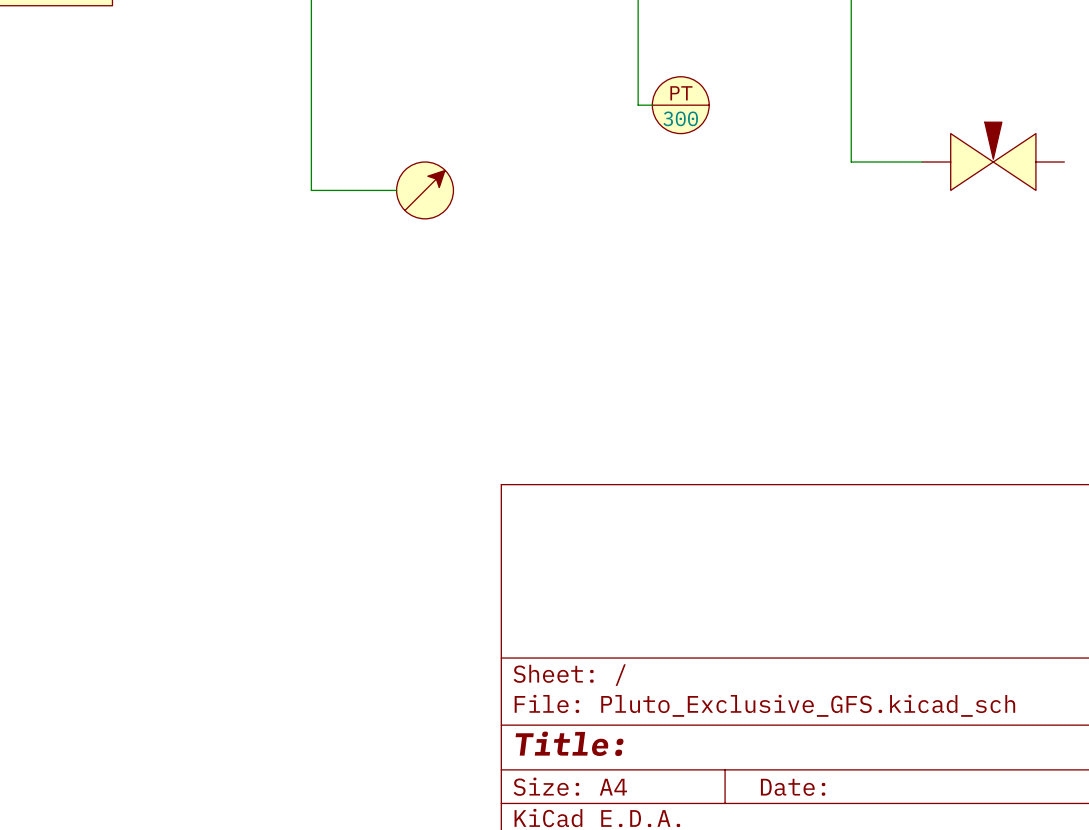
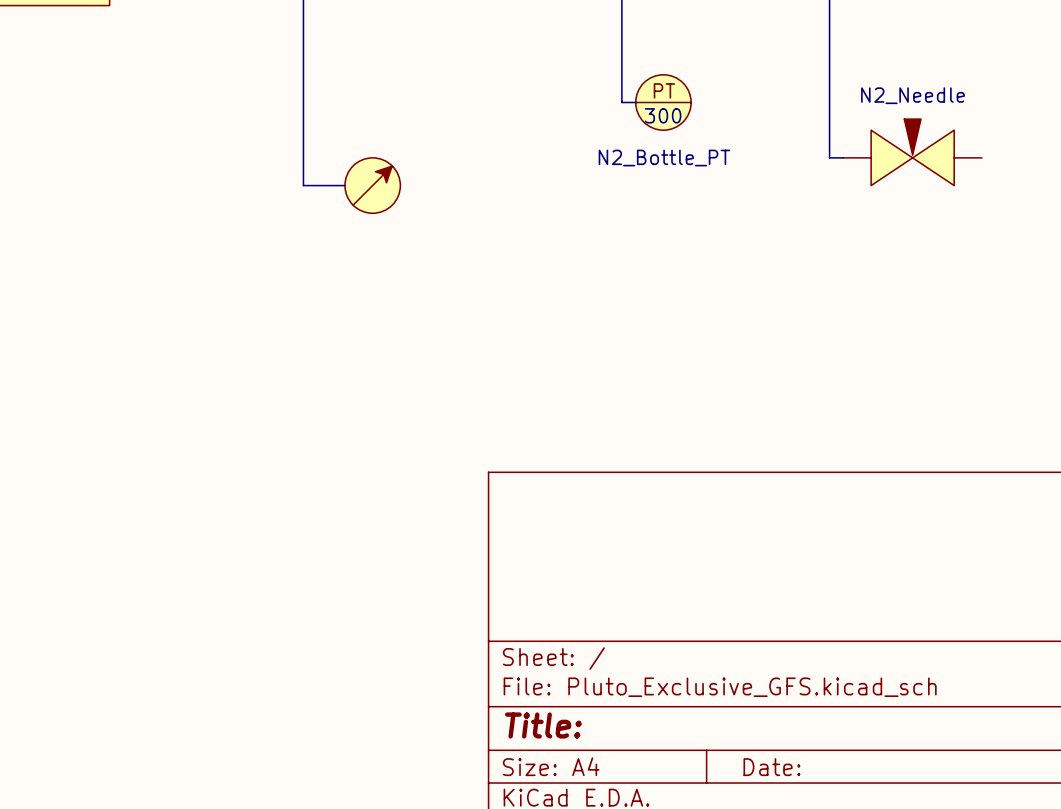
N2_Needle: none -> (912, 152)
part: (993, 156) -> none
N2_Bottle_PT name: none -> N2_Bottle_PT (664, 158)
part position: (425, 190) -> (372, 185)

